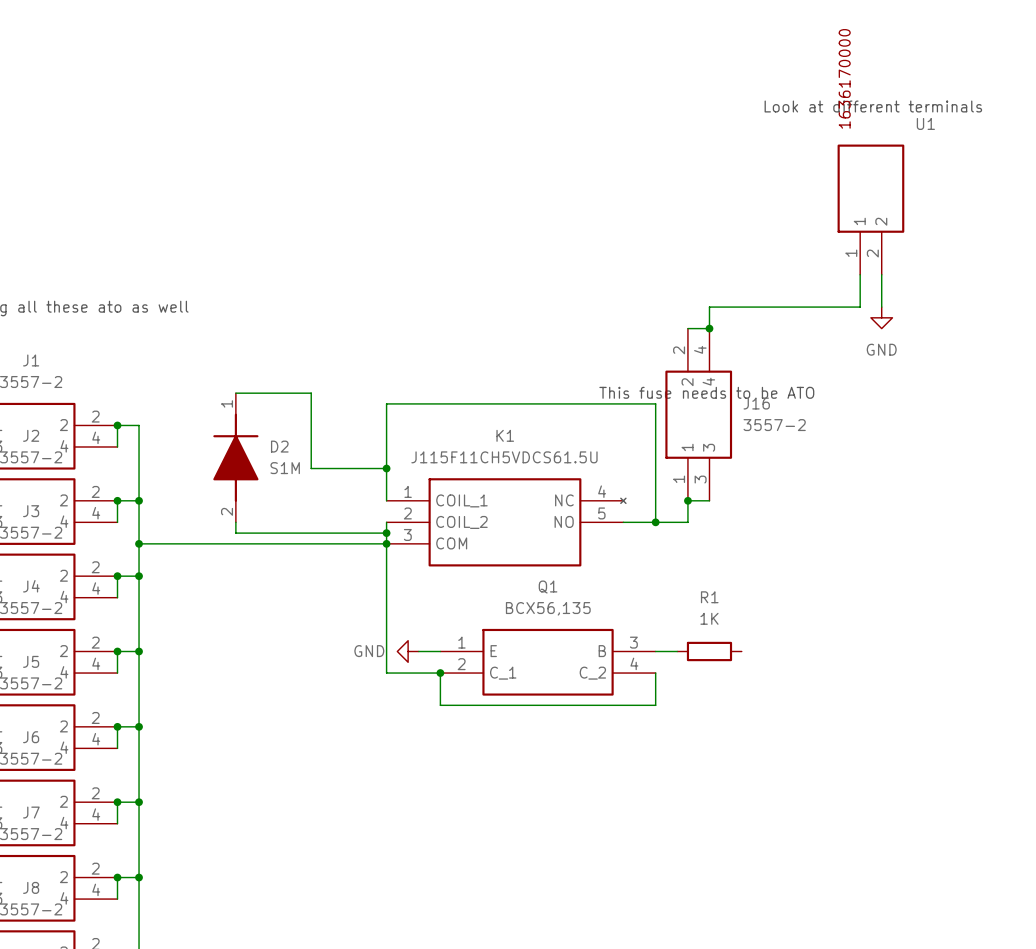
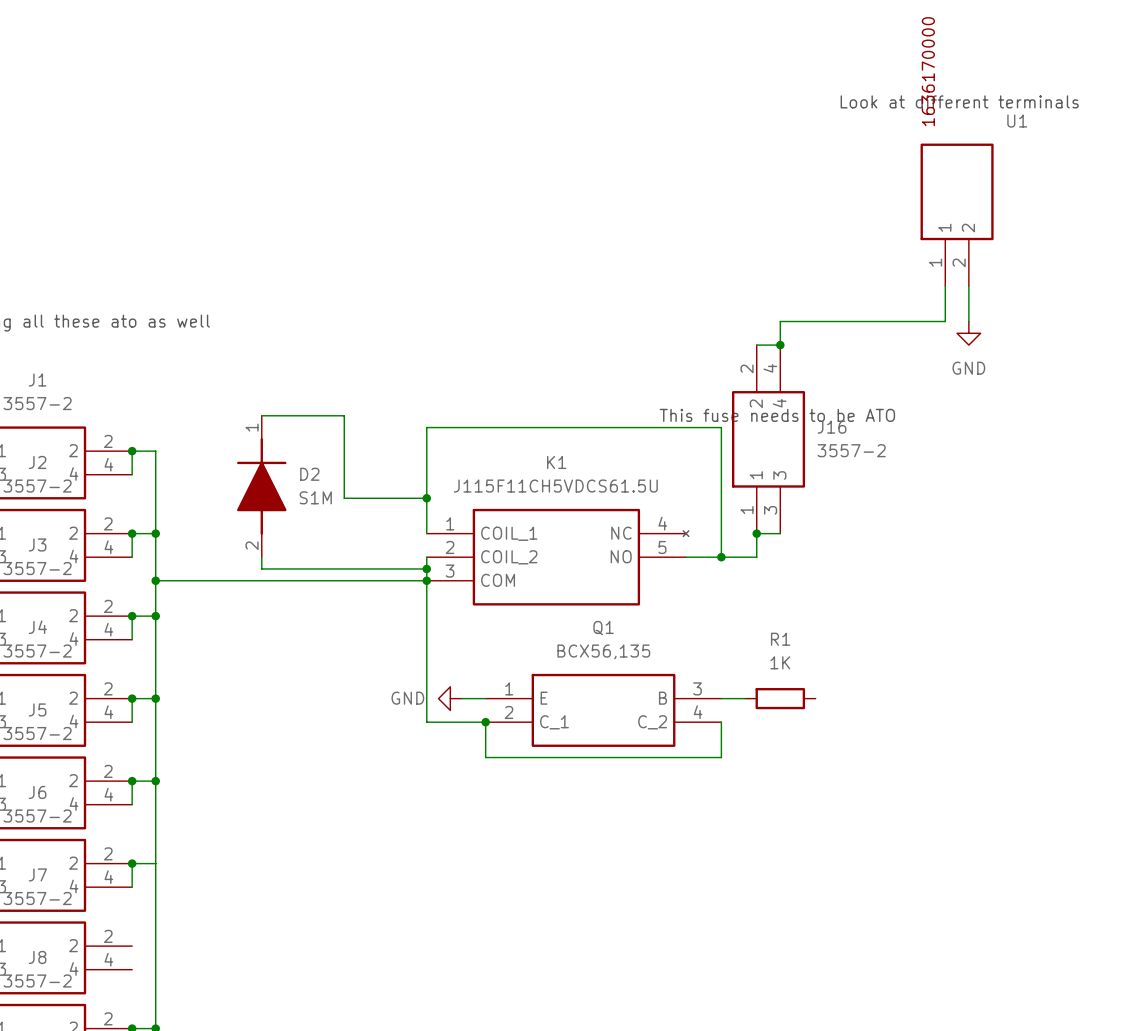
junction: (139, 802) -> none
junction: (117, 877) -> none
wire: (139, 877) (117, 877) (117, 899) -> none
junction: (139, 877) -> none

